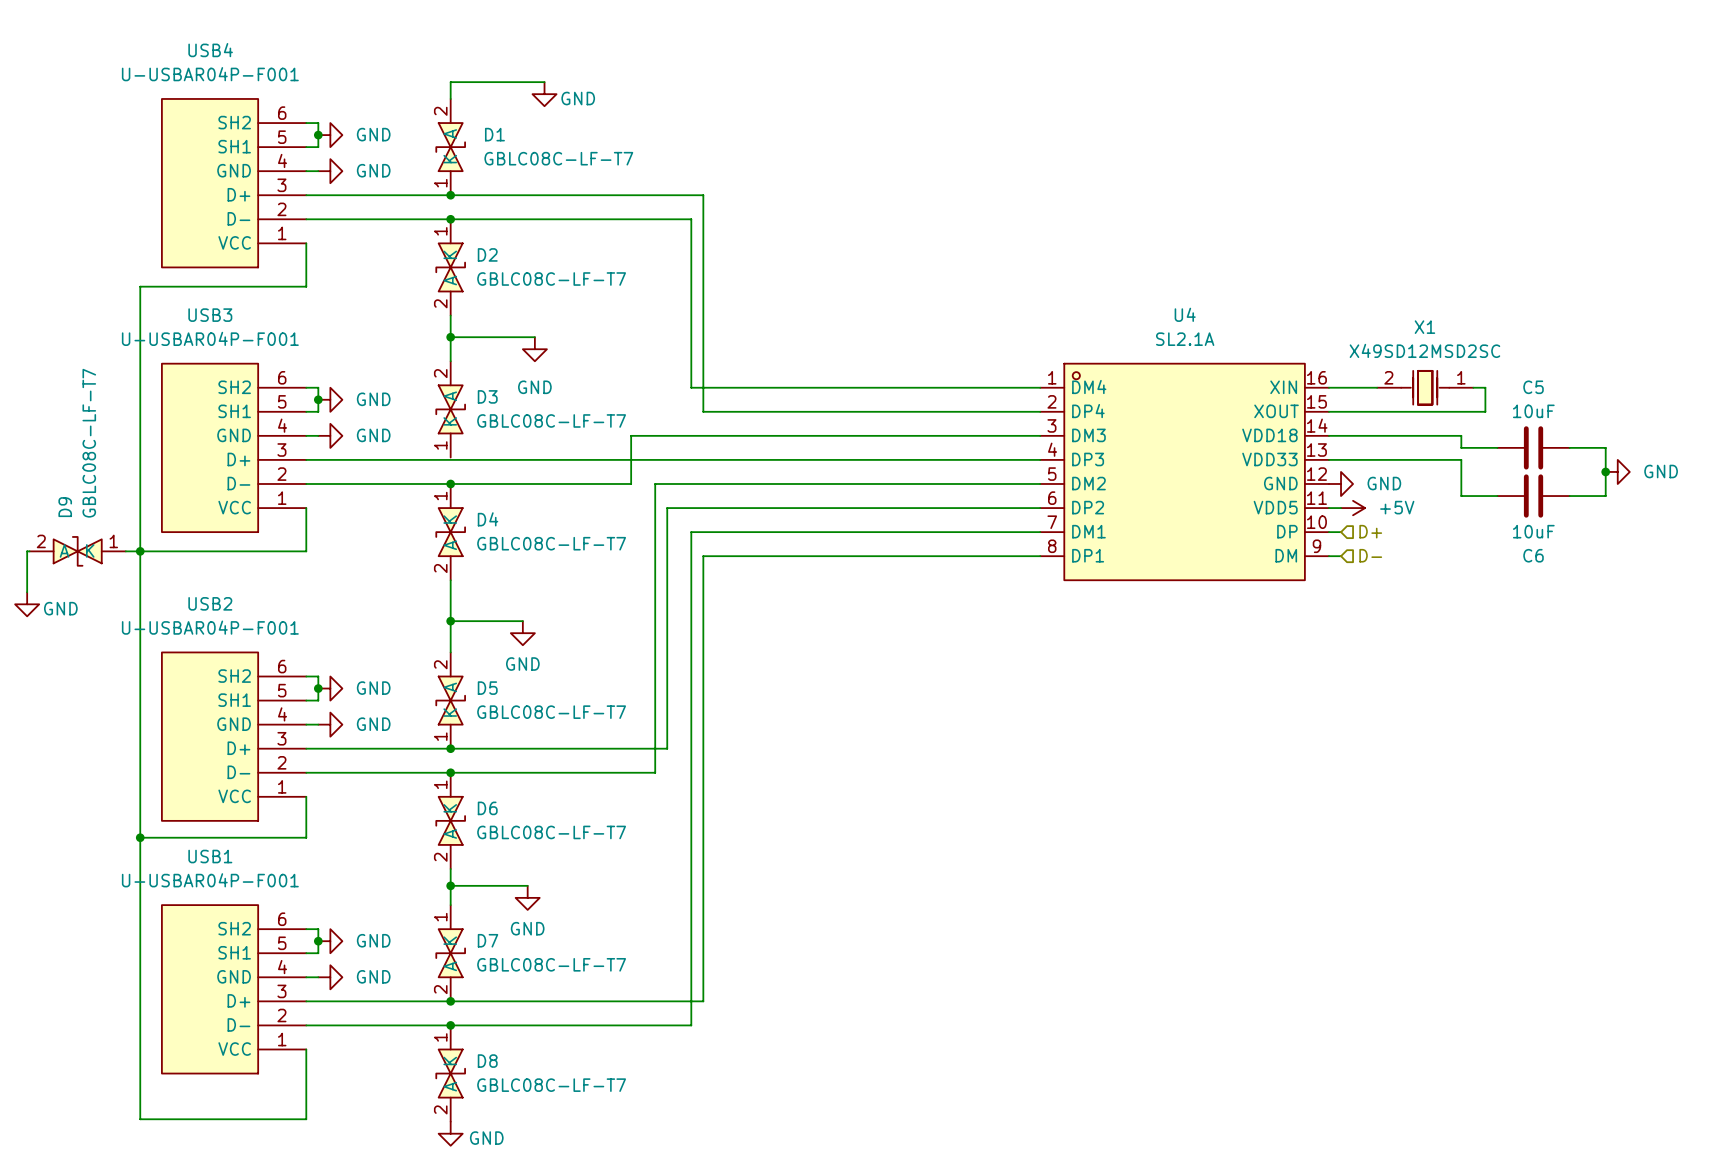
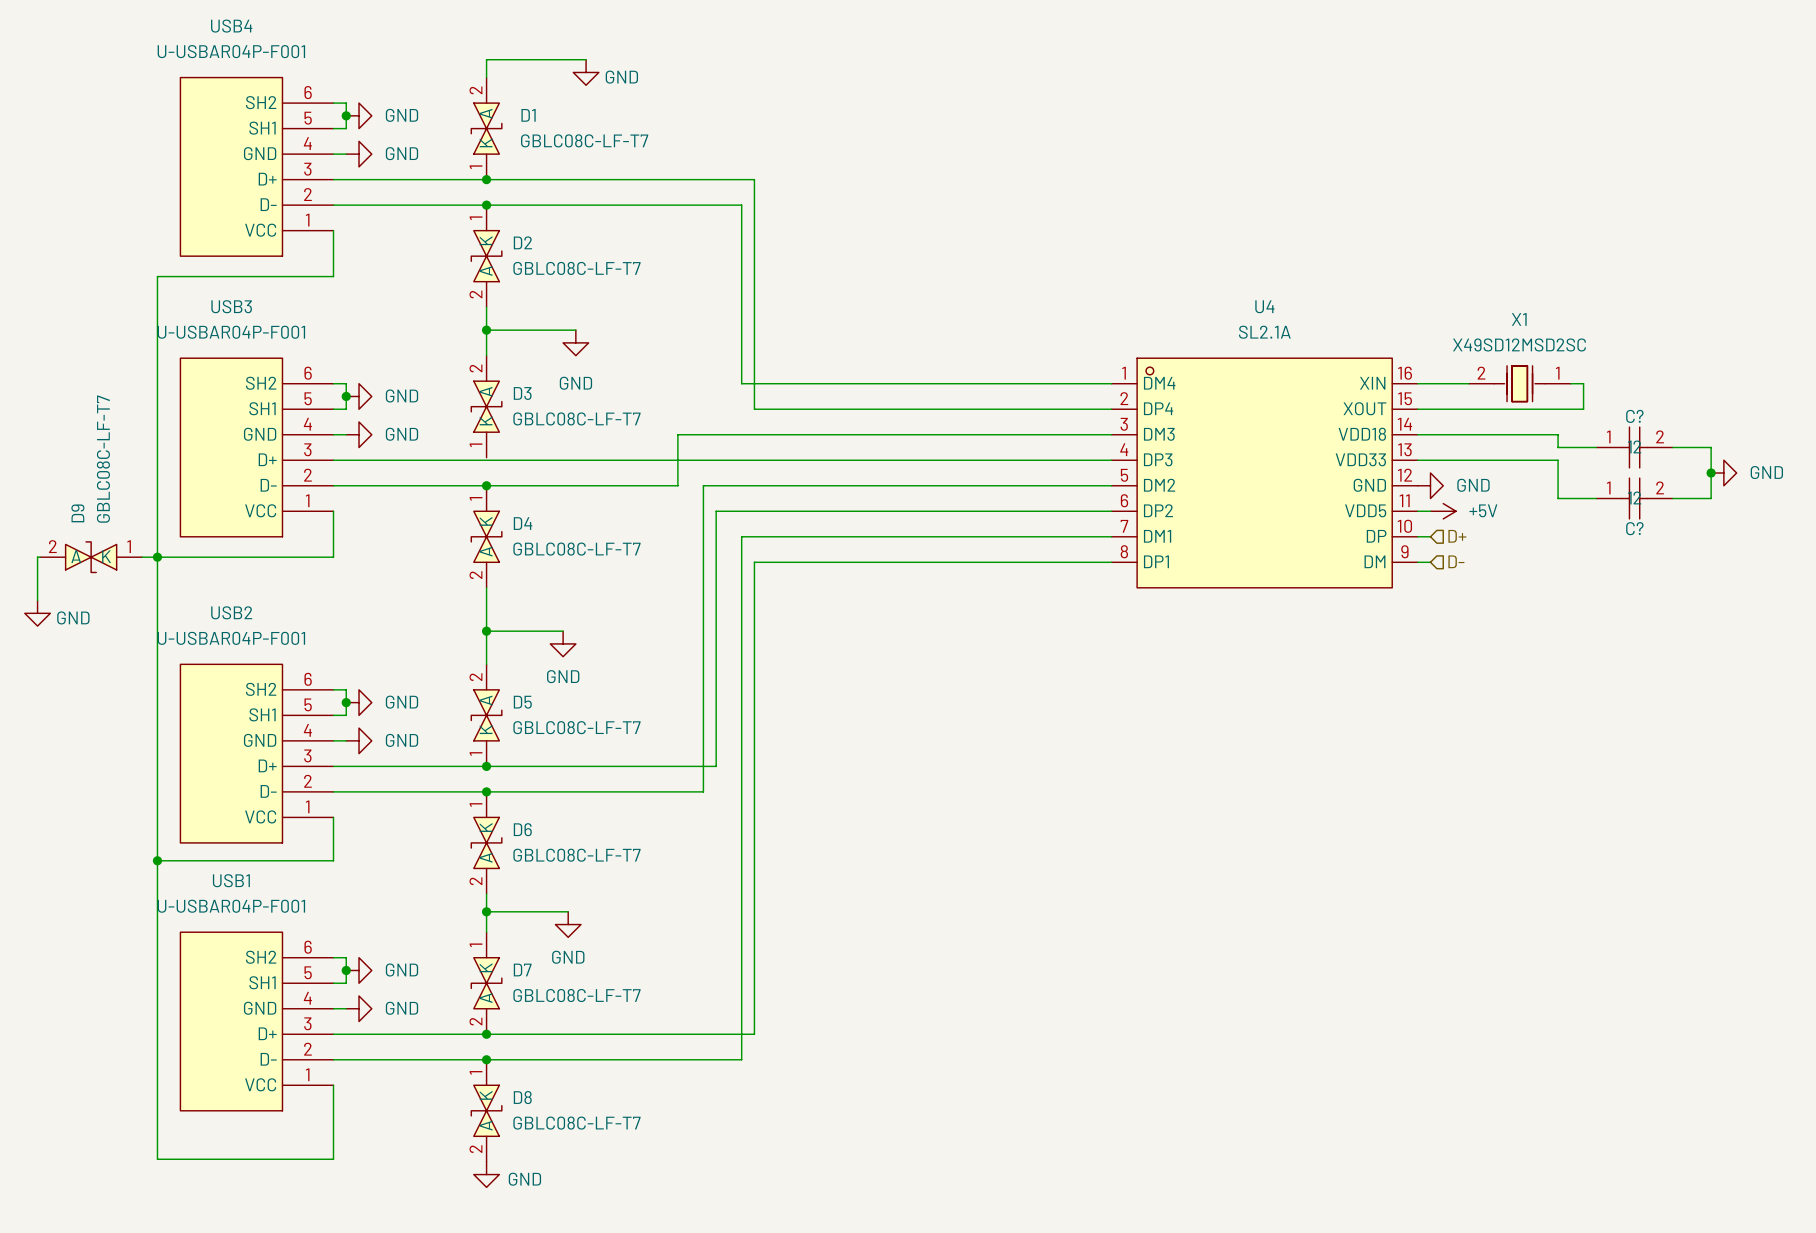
C5: 10uF (1533, 447) -> none
C?: none -> (1634, 447)
C6: 10uF (1533, 496) -> none
C?: none -> (1634, 498)

